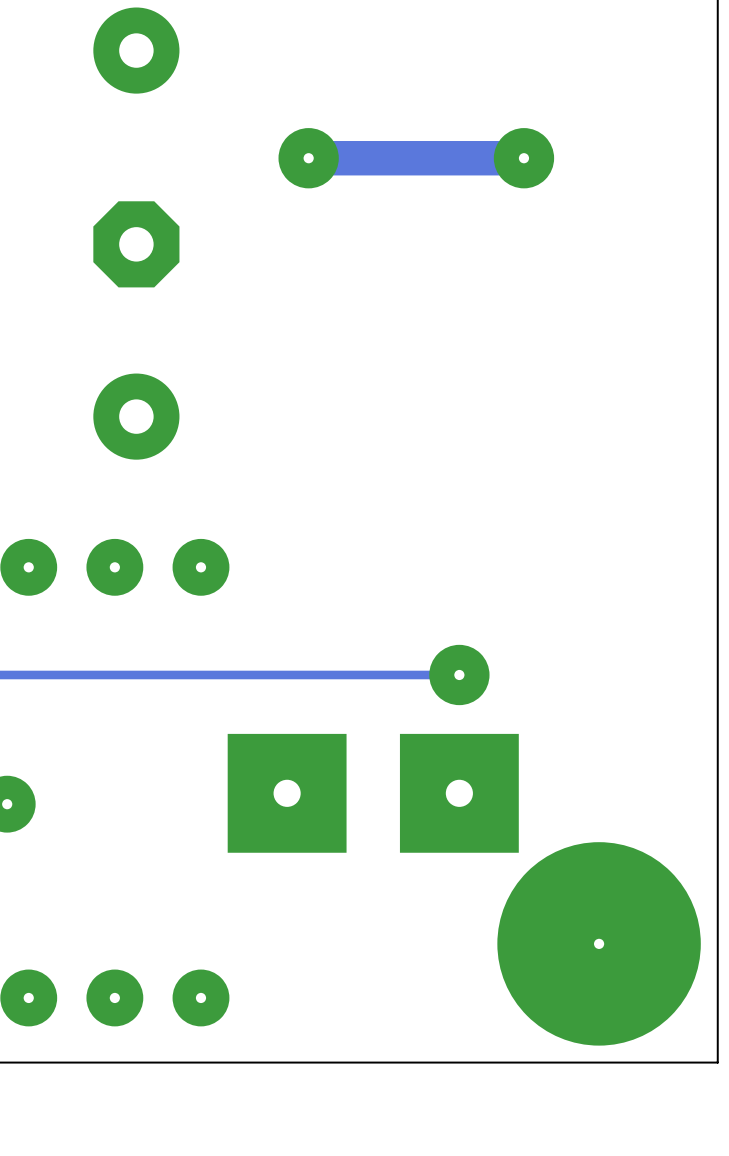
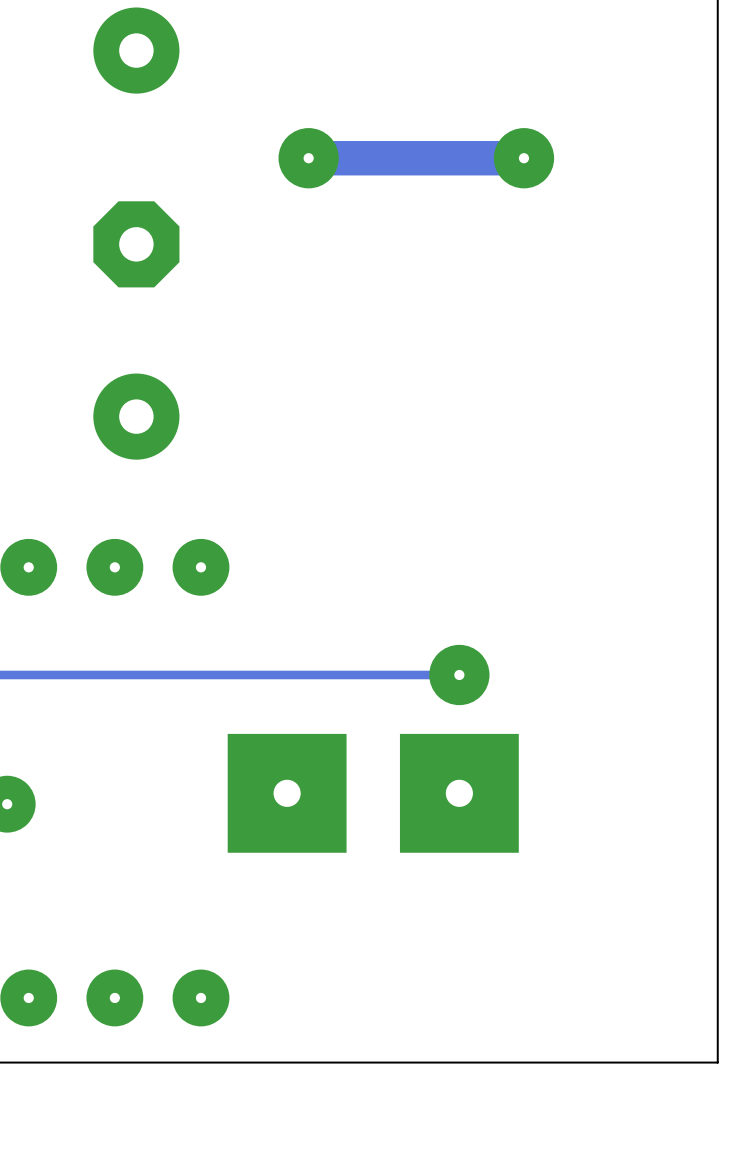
via: (599, 943) -> none

